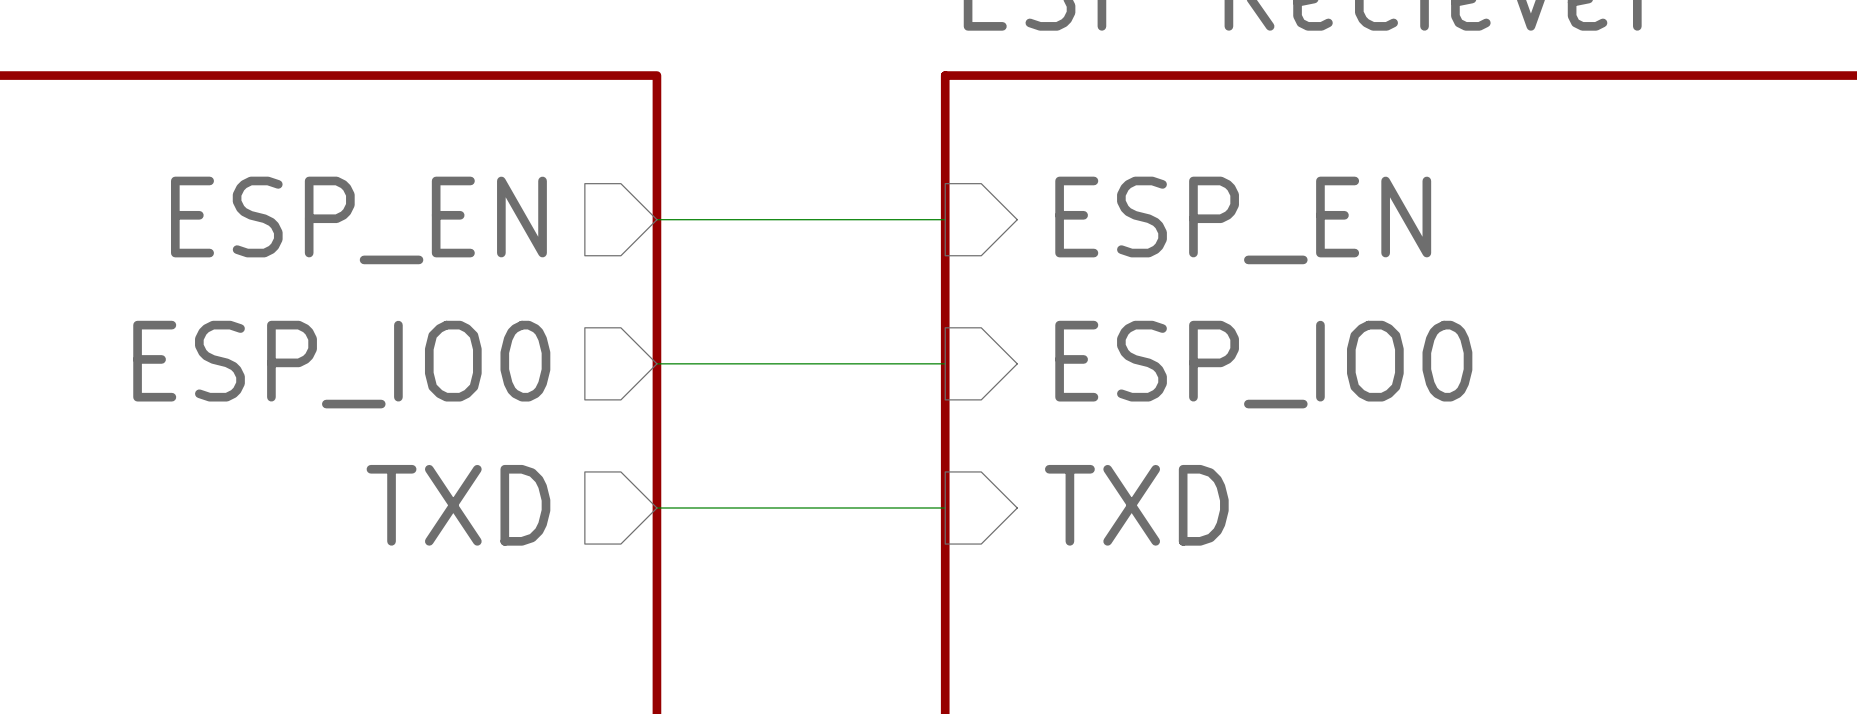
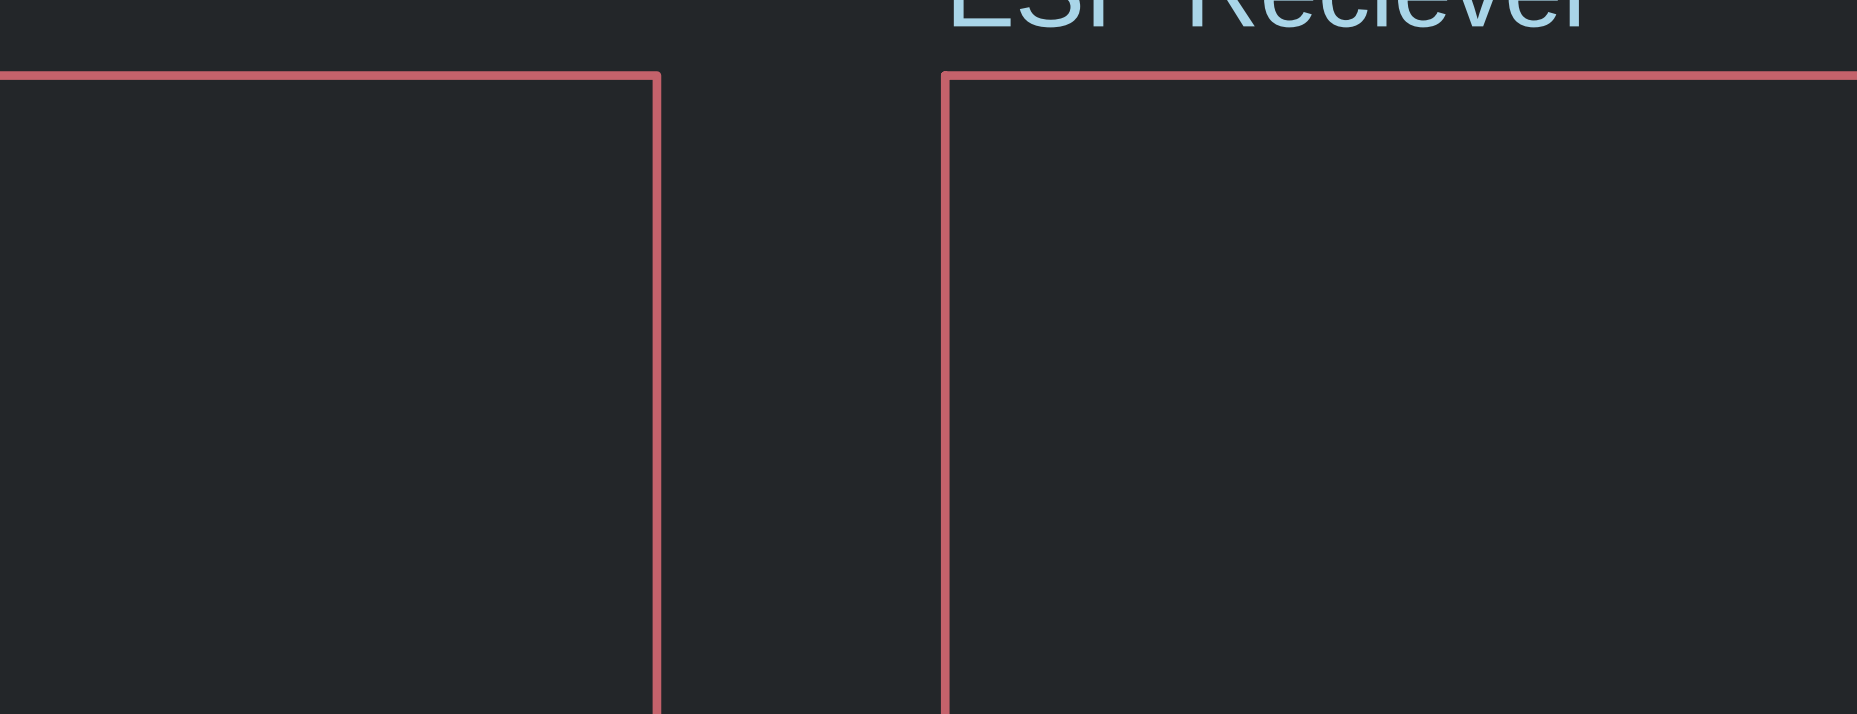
wire: (656, 219) (945, 219) -> none
sheet pin: ESP_EN (358, 220) -> none
sheet pin: ESP_EN (1243, 220) -> none
wire: (656, 363) (945, 363) -> none
sheet pin: ESP_IO0 (341, 364) -> none
sheet pin: ESP_IO0 (1263, 364) -> none
sheet pin: TXD (458, 505) -> none
sheet pin: TXD (1136, 505) -> none
wire: (656, 507) (945, 507) -> none

